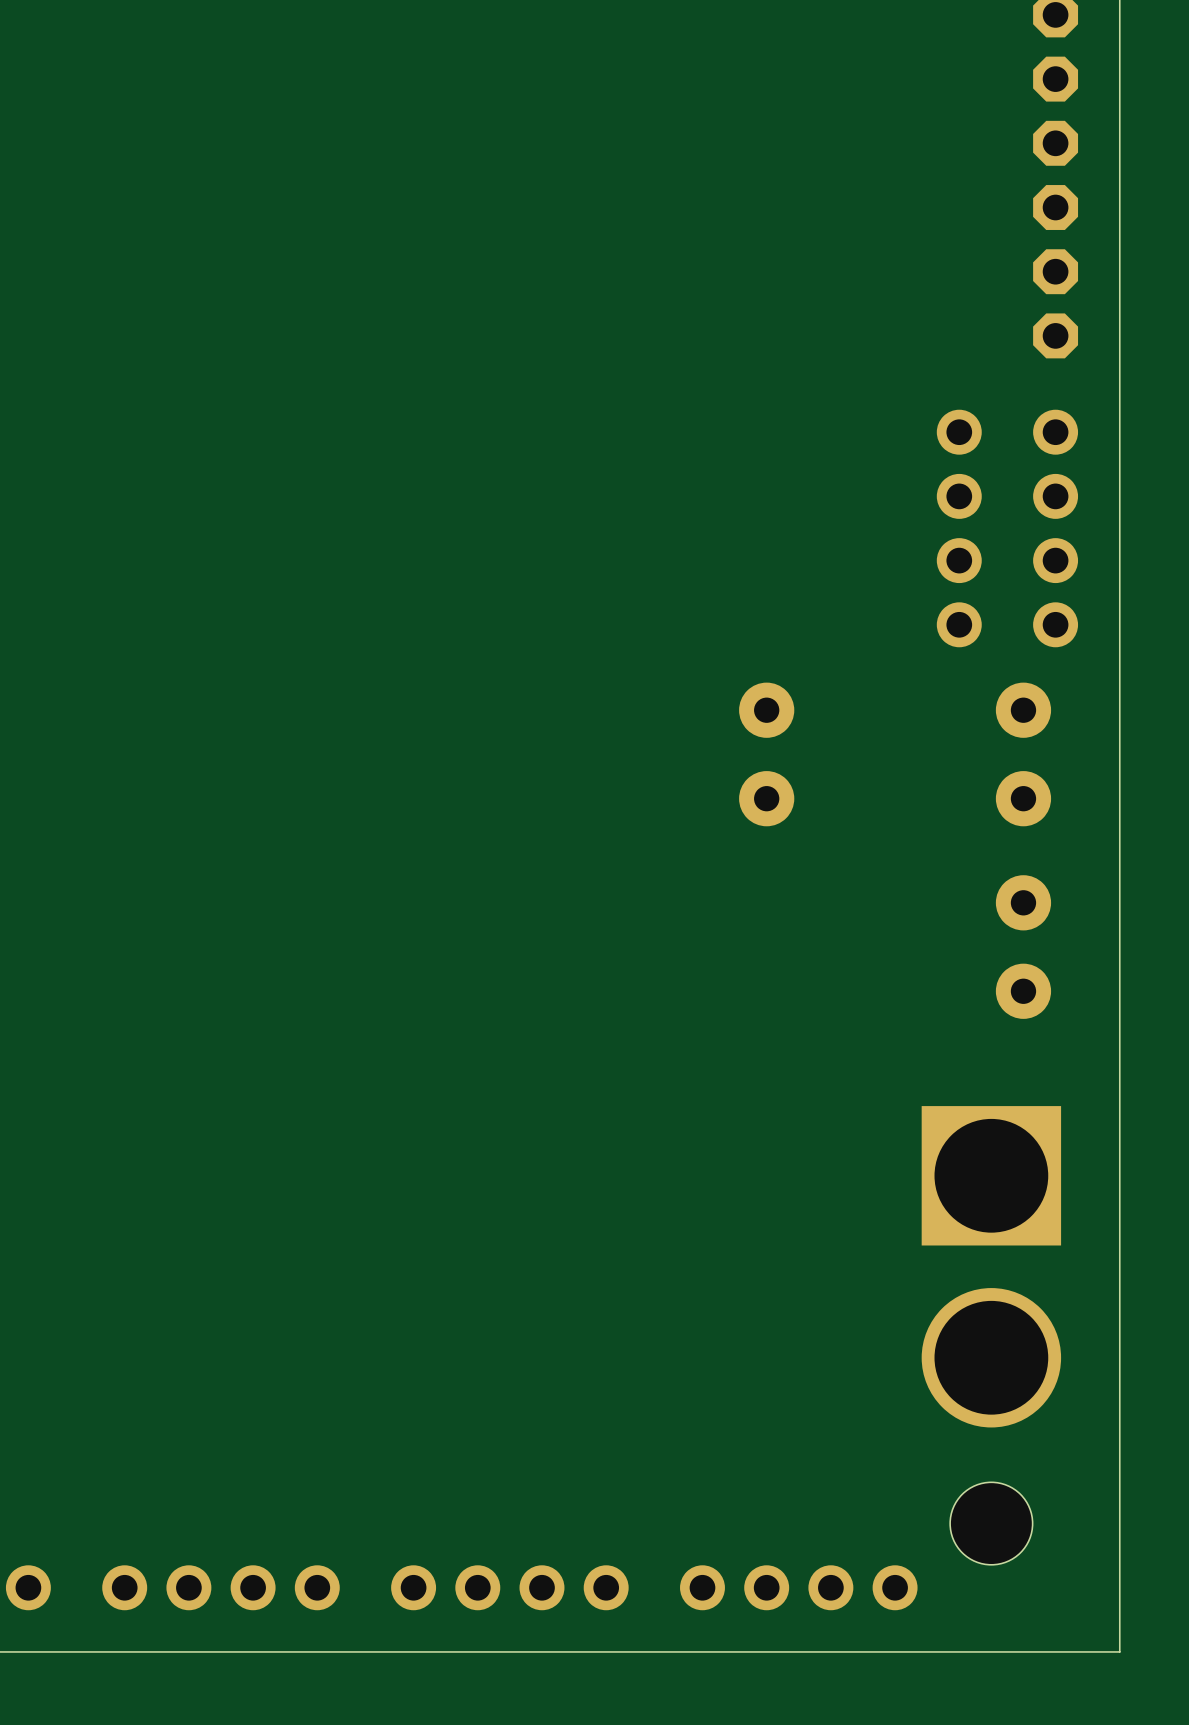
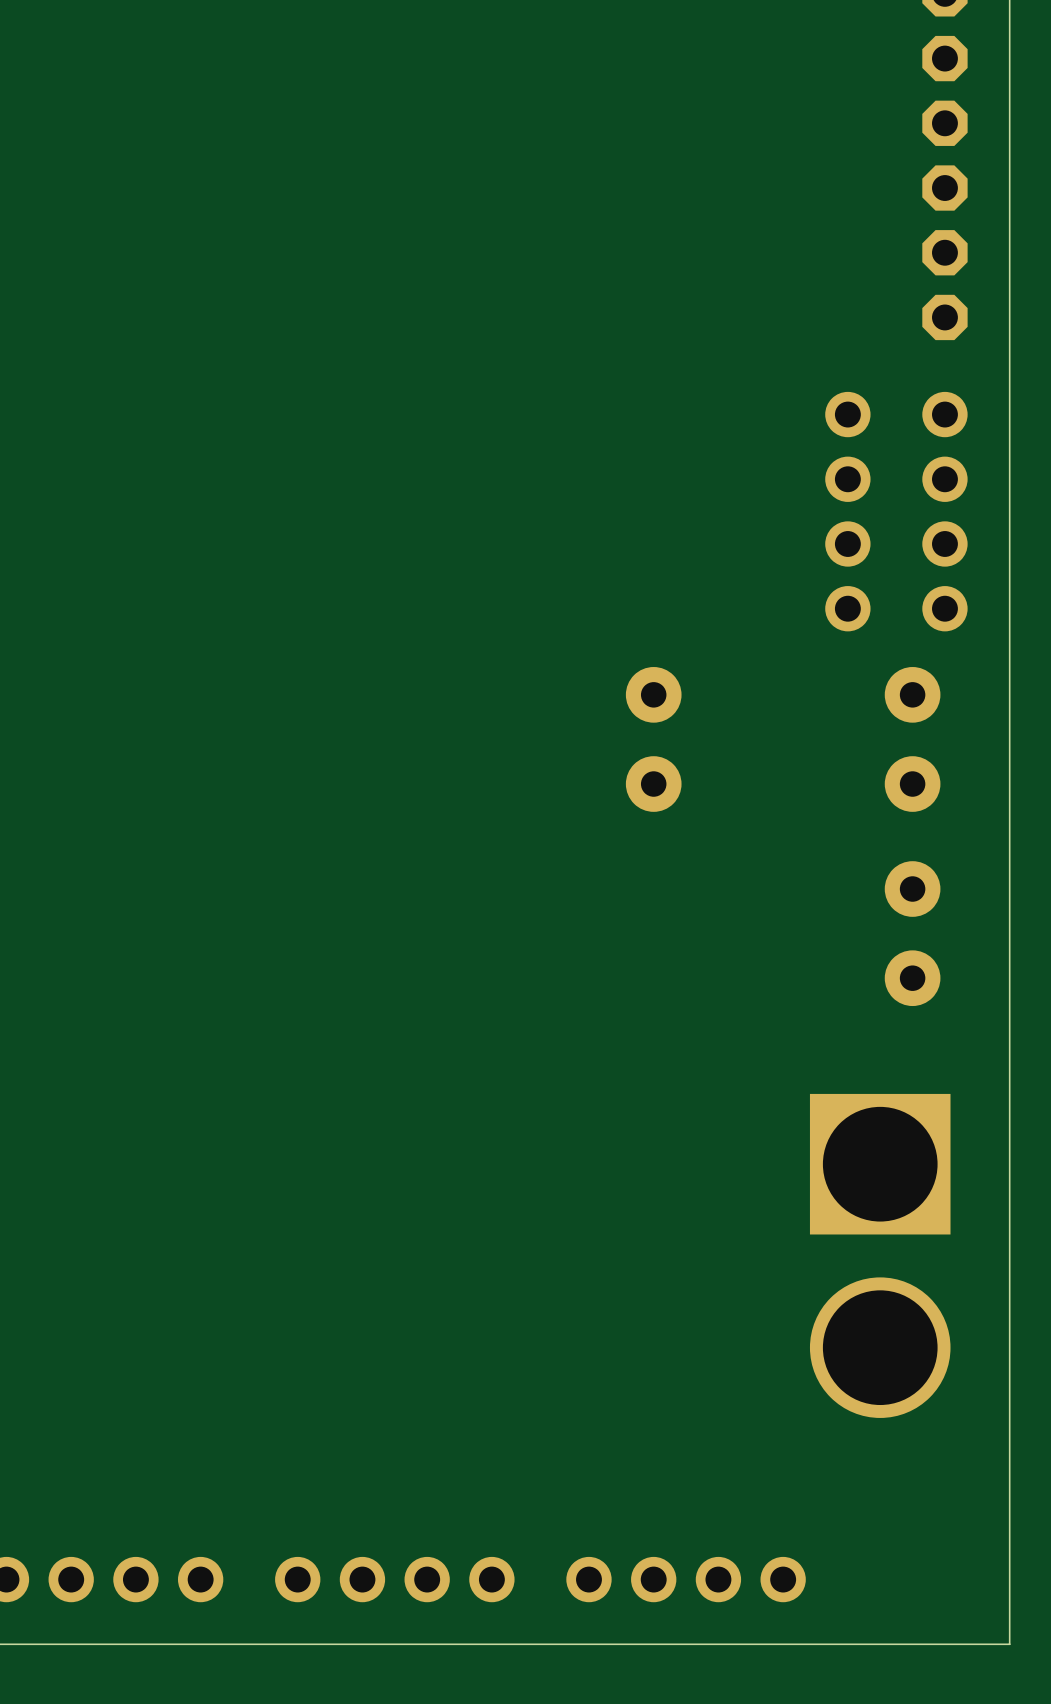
hole: (991, 1523) -> none

